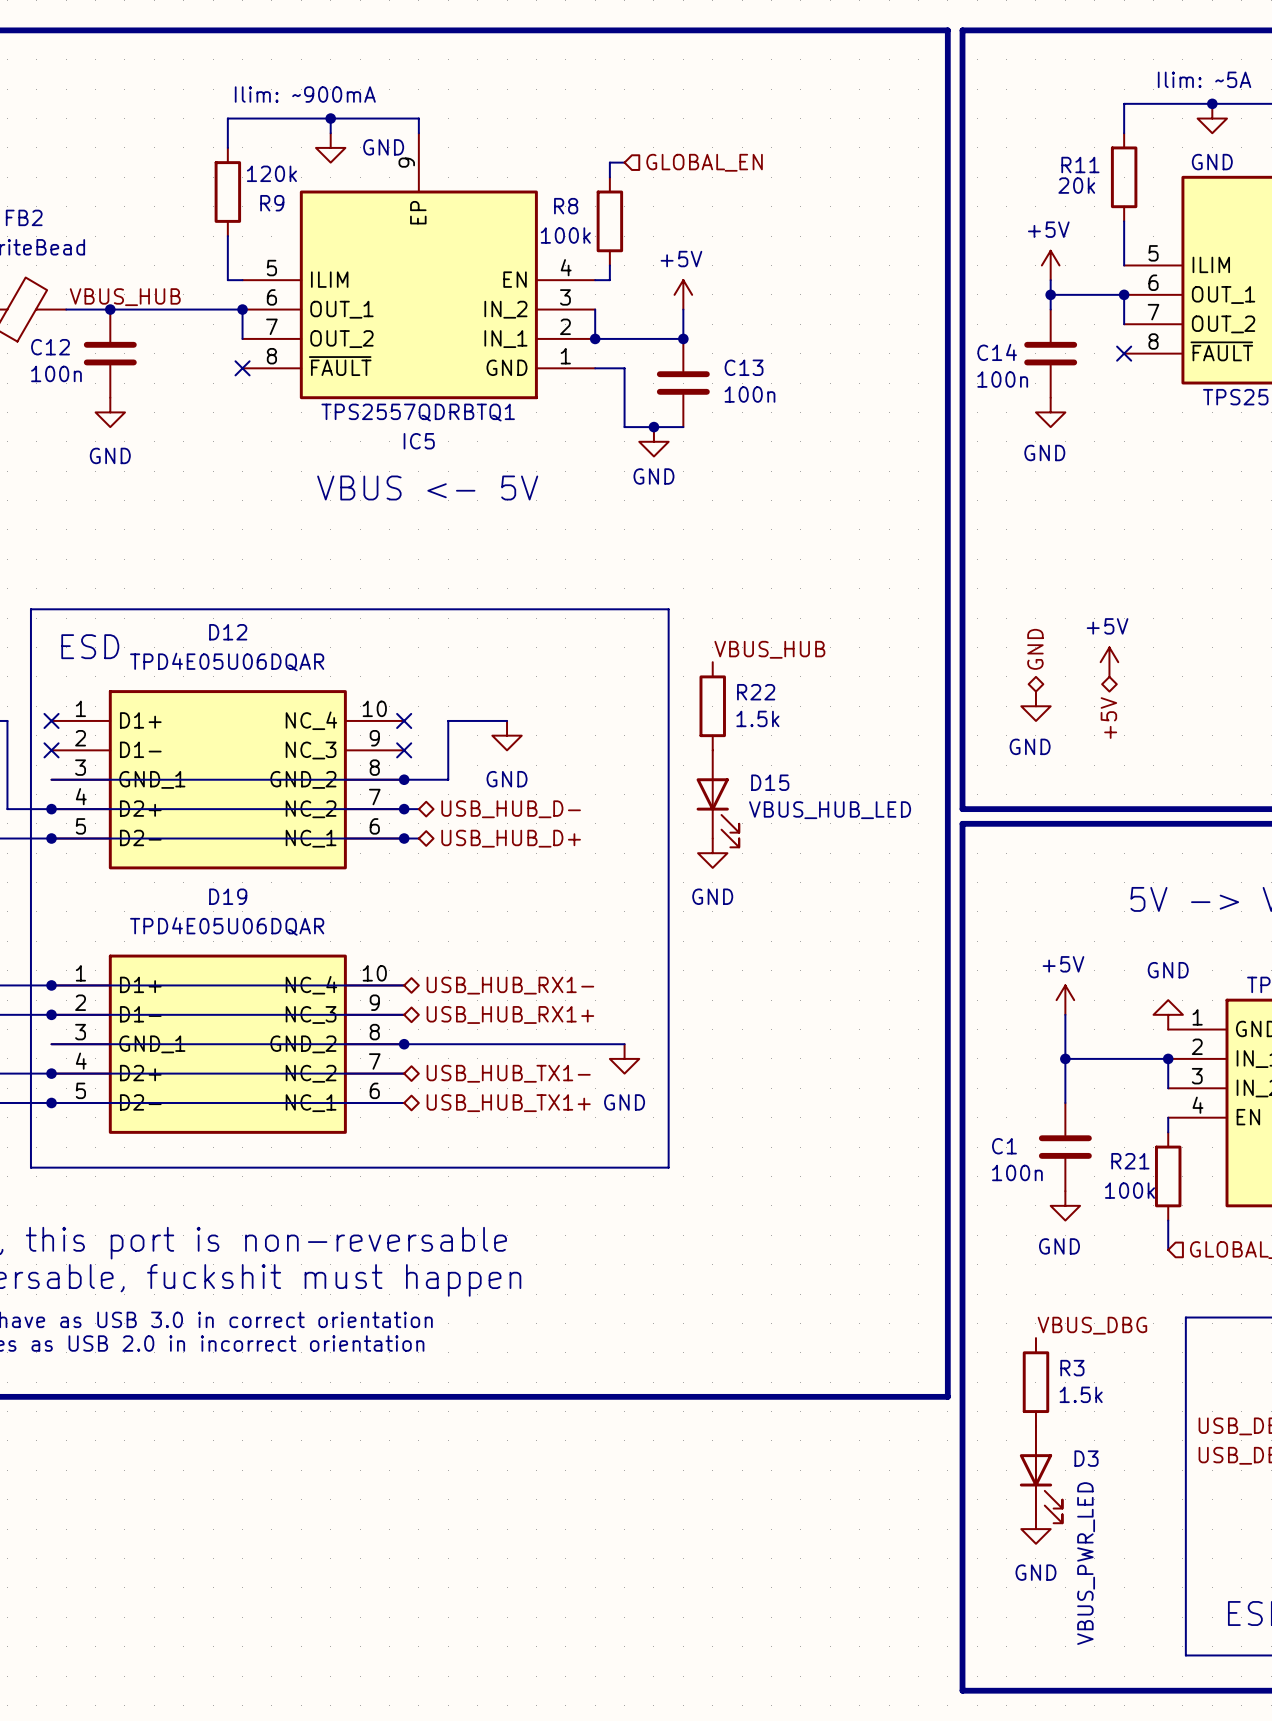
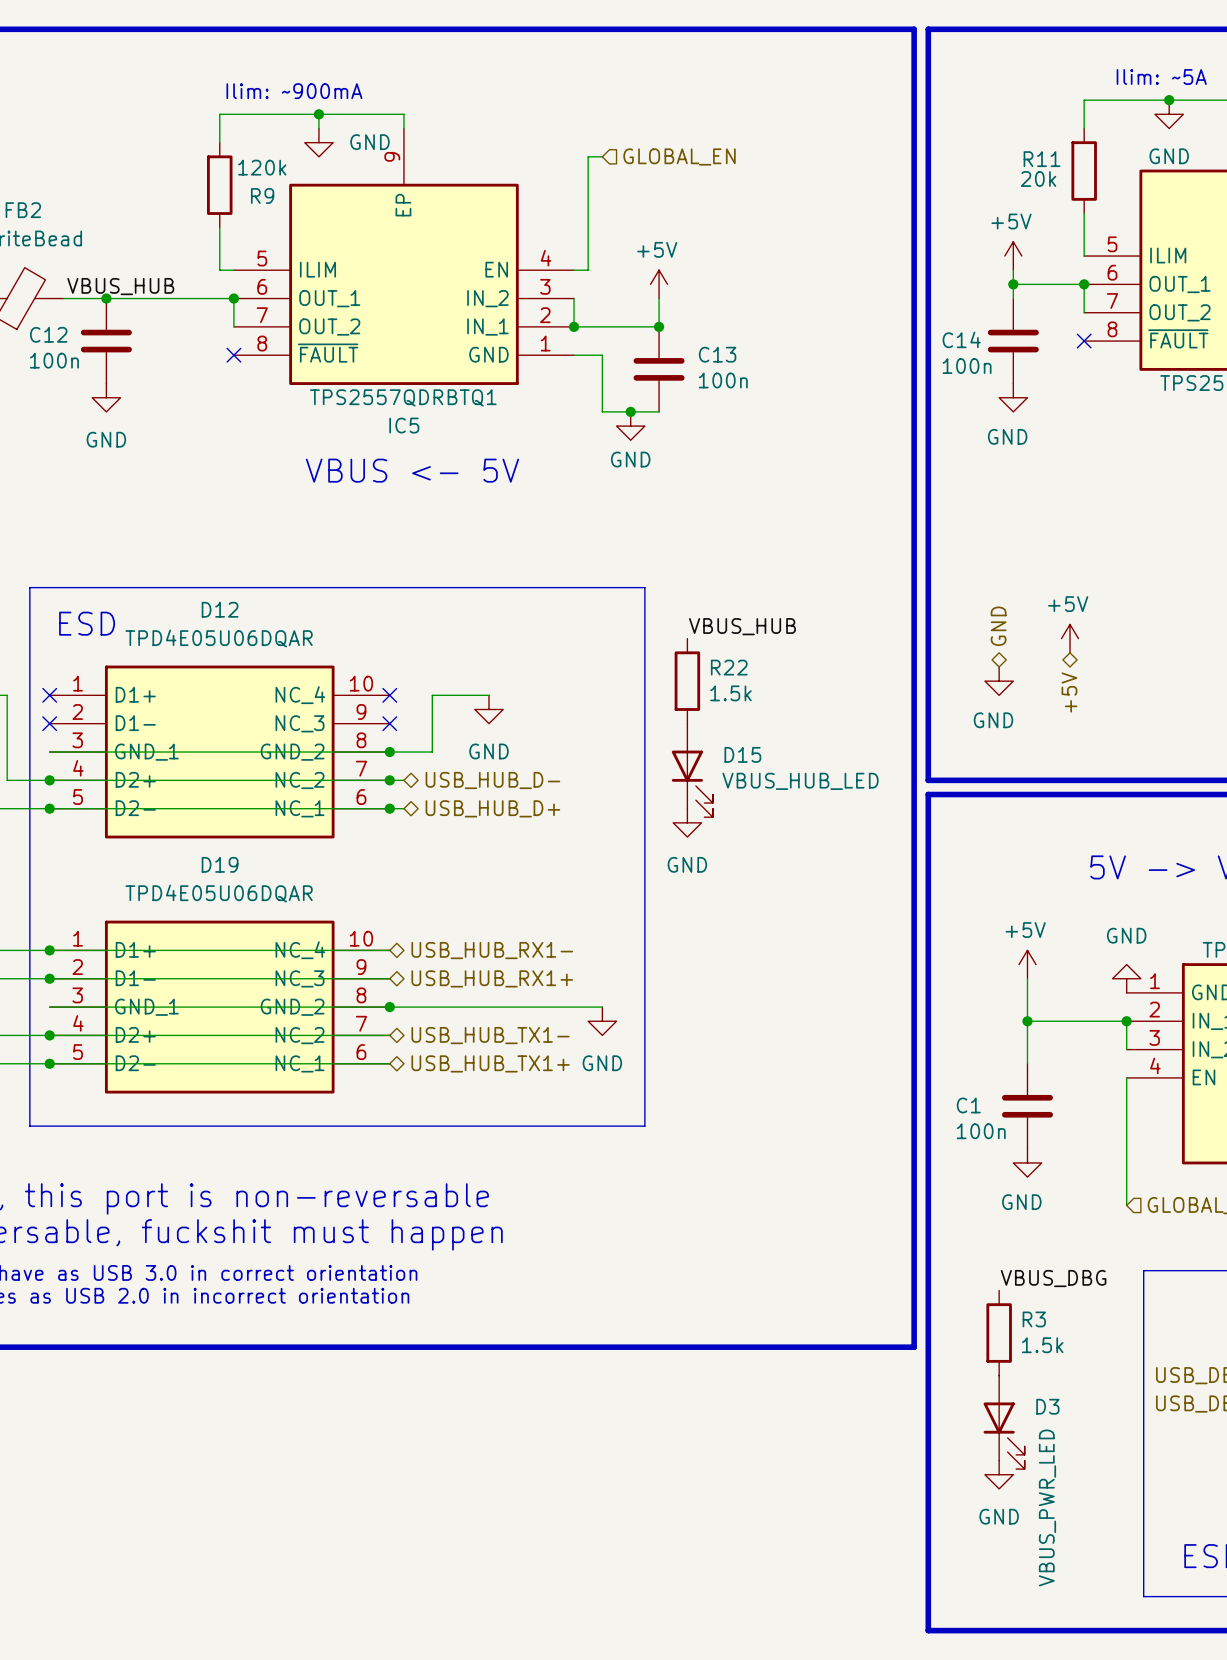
wire: none -> (588, 171) (588, 256)
R8: 100k (609, 221) -> none
wire: none -> (1126, 1092) (1126, 1177)
R21: 100k (1168, 1176) -> none

